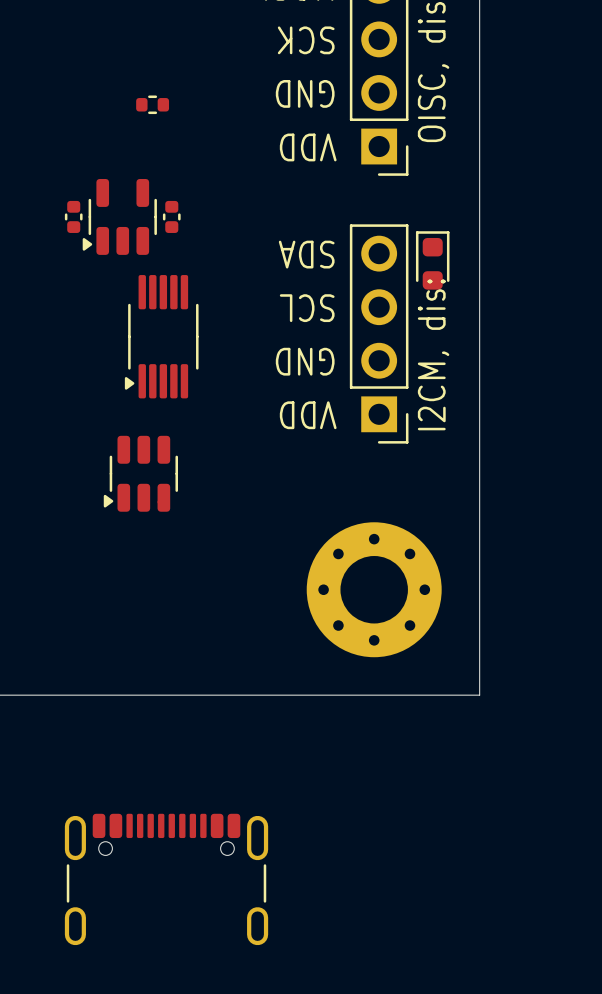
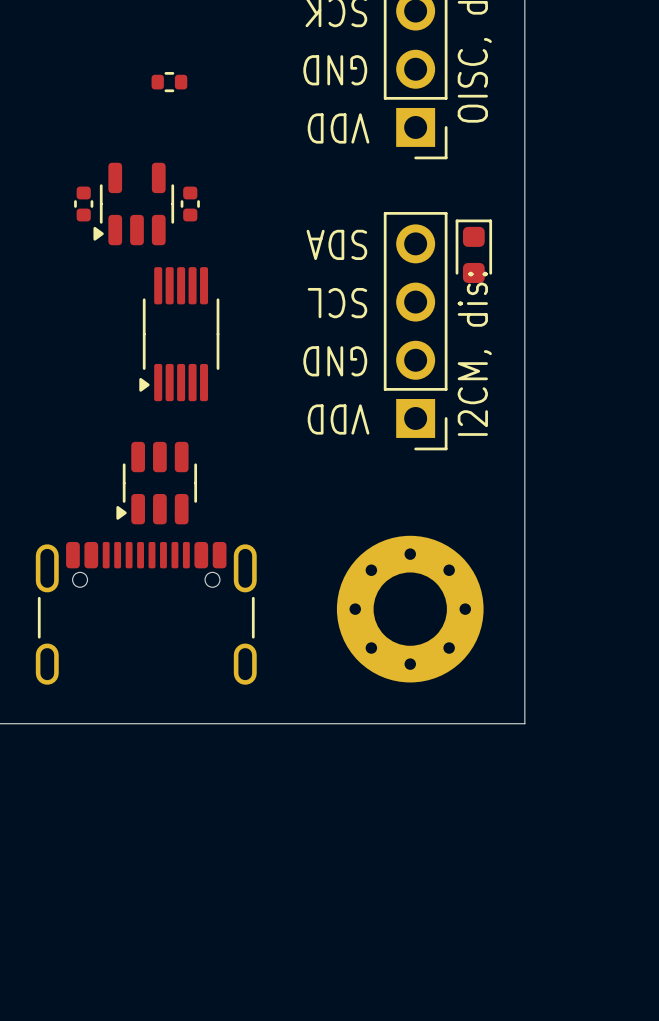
part: none -> (146, 613)
part: (166, 879) -> none

